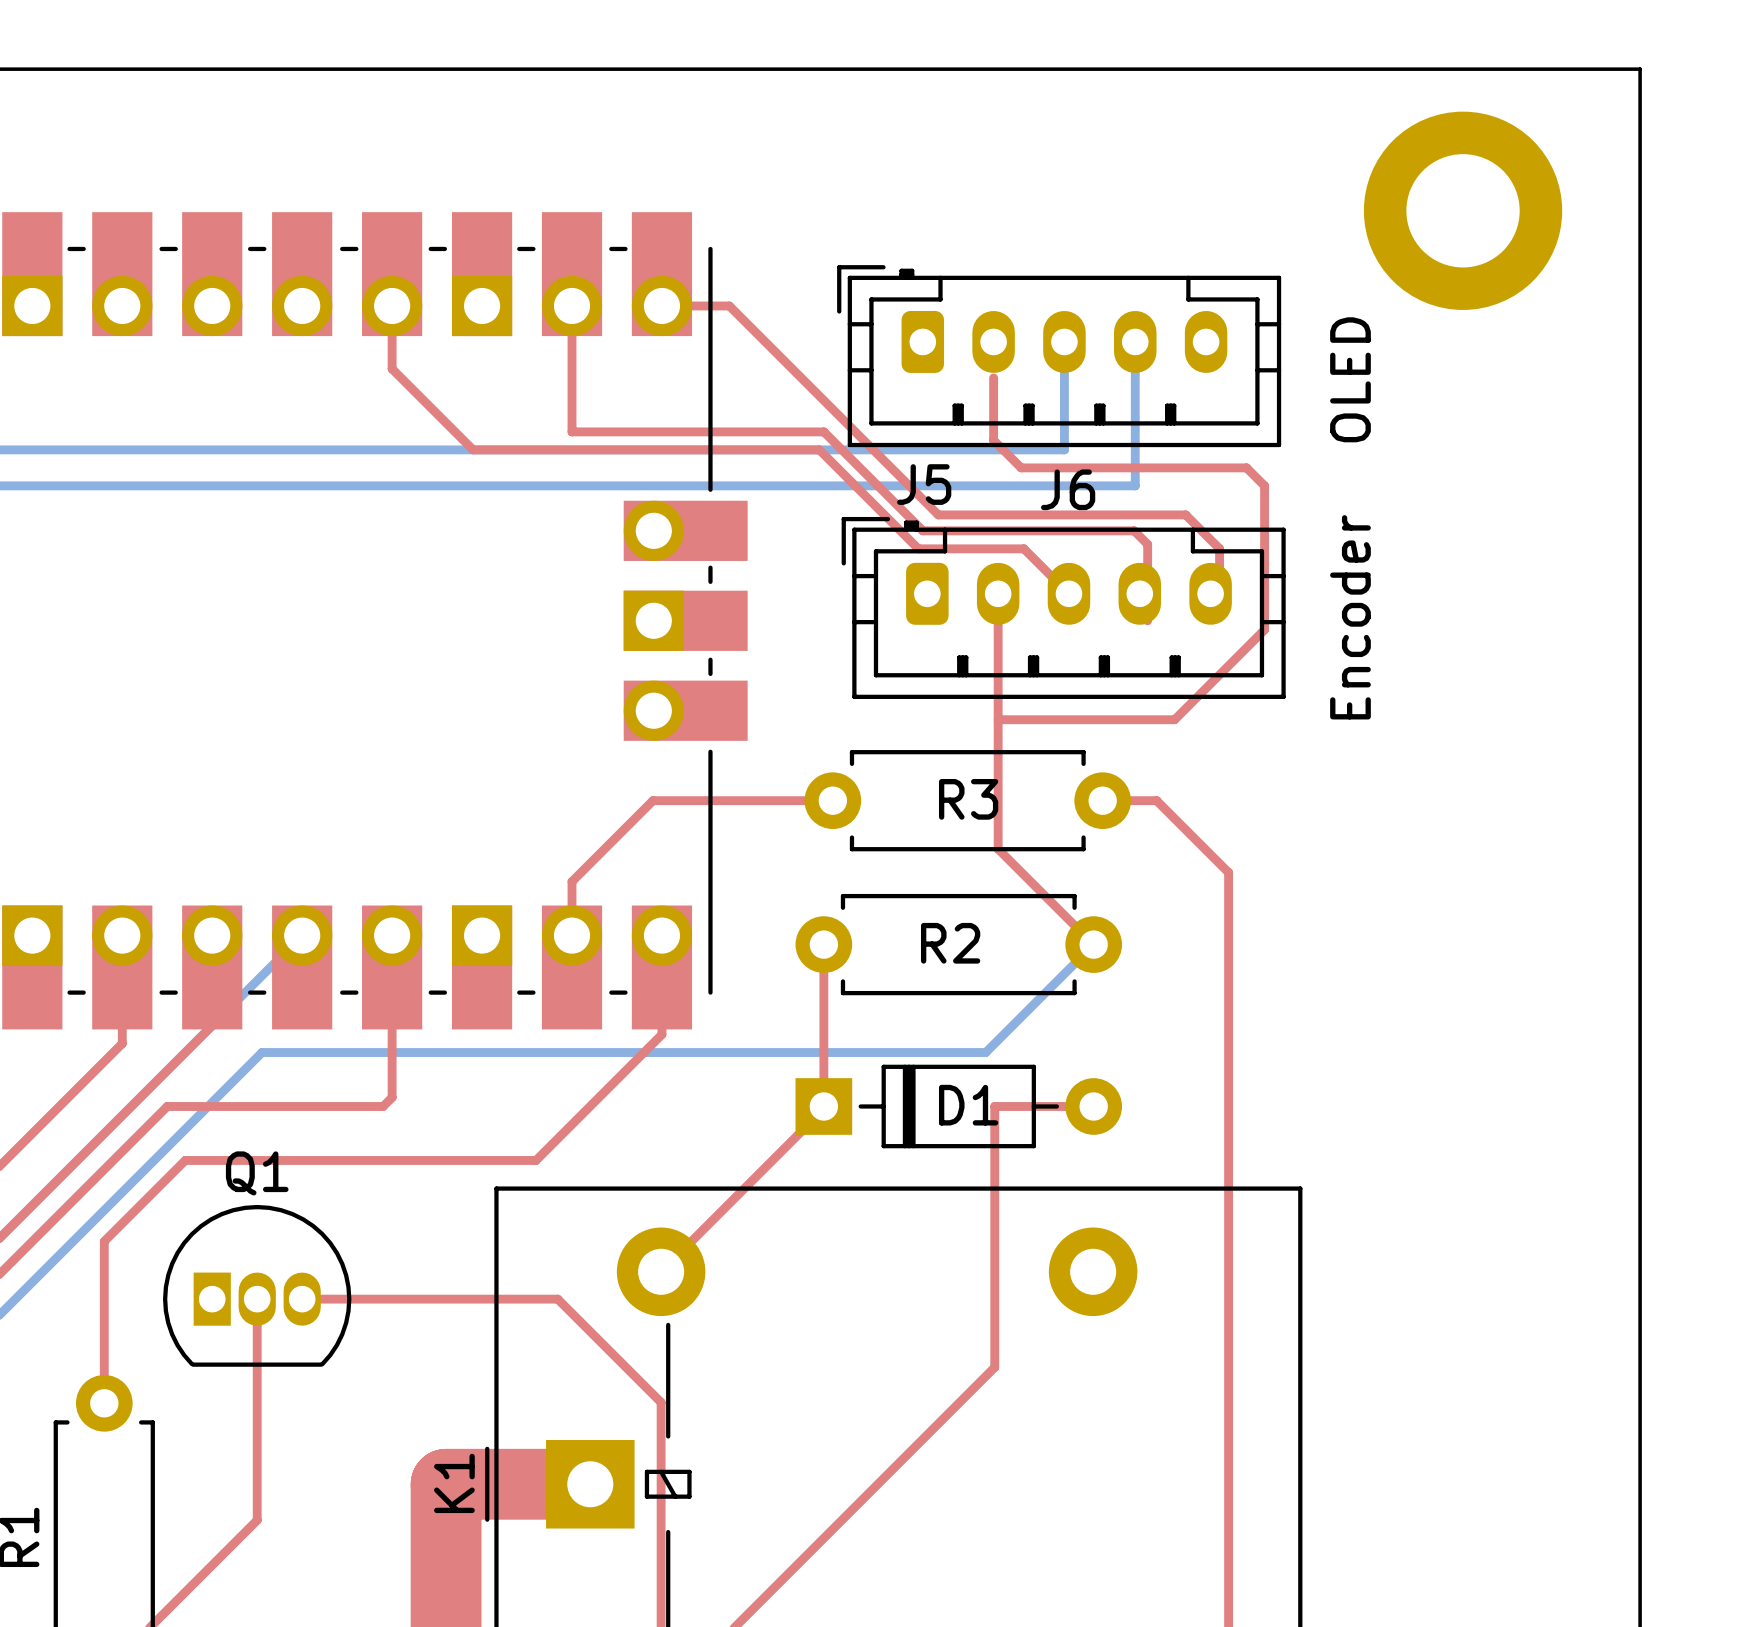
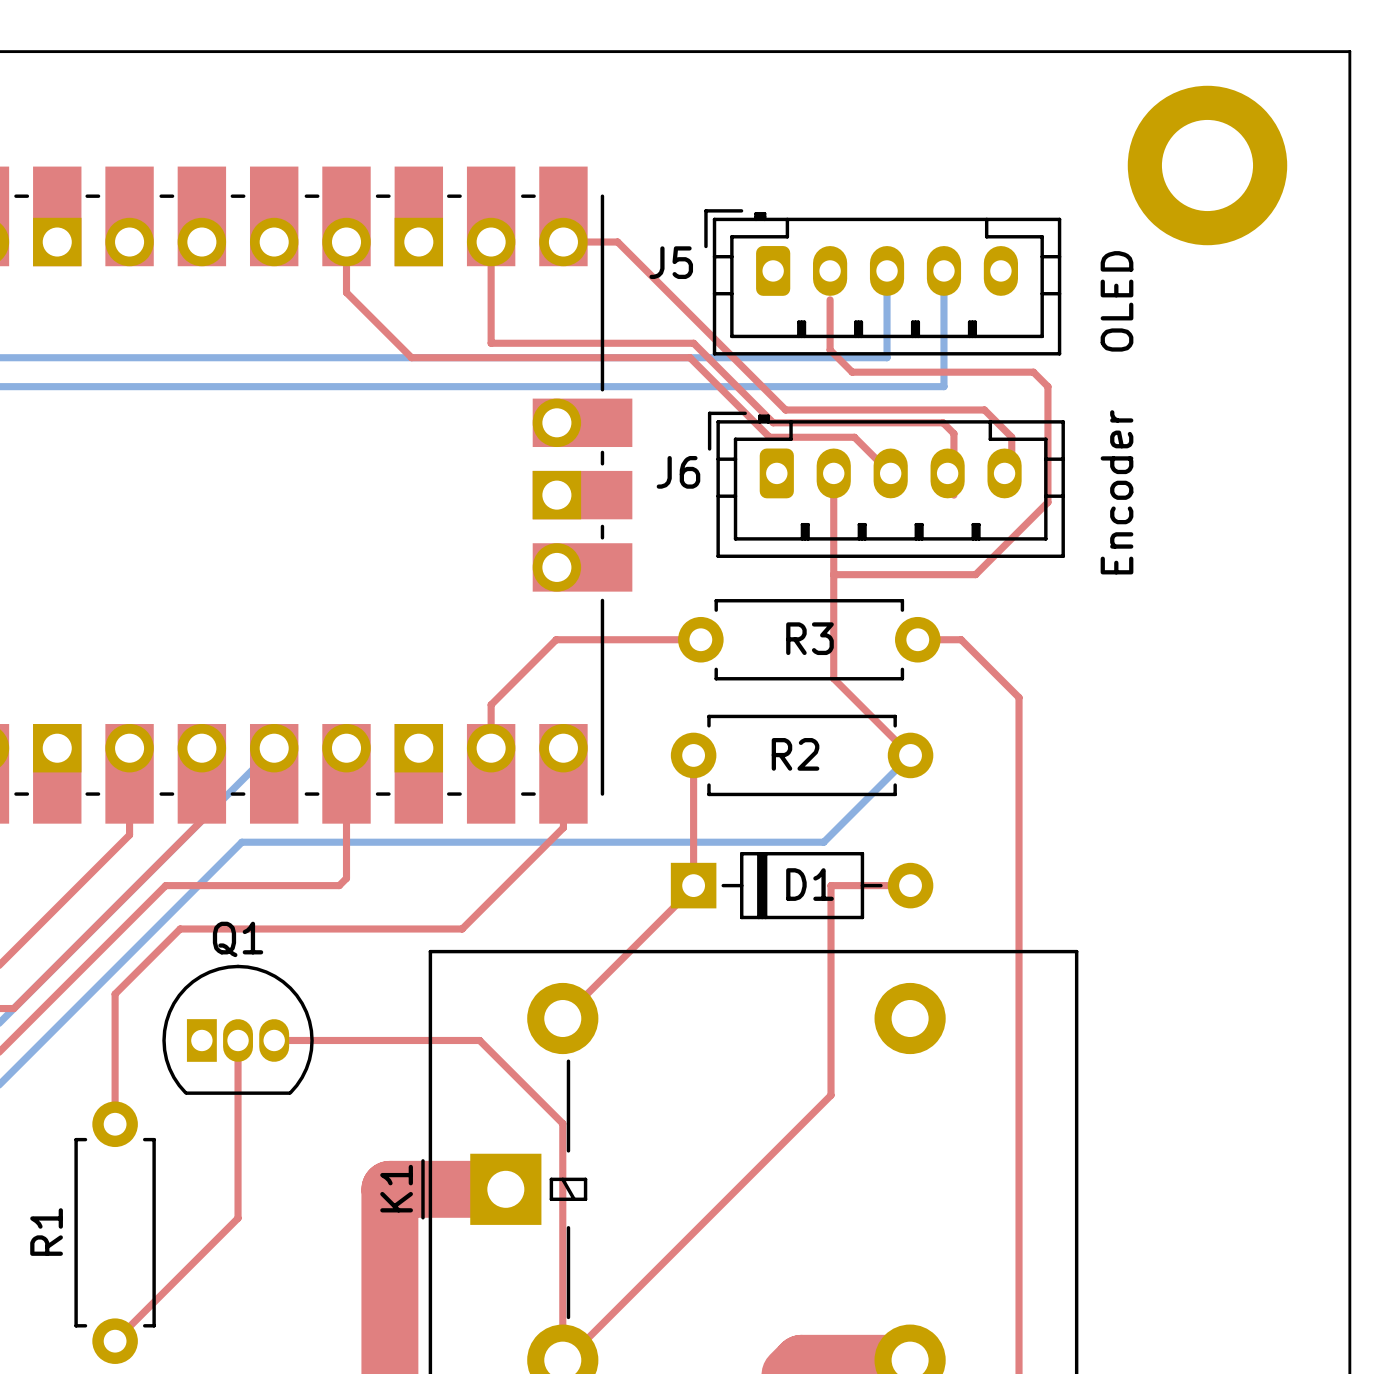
J5 name position: J5 (924, 484) -> J5 (671, 262)
J6 name position: J6 (1068, 489) -> J6 (678, 472)

